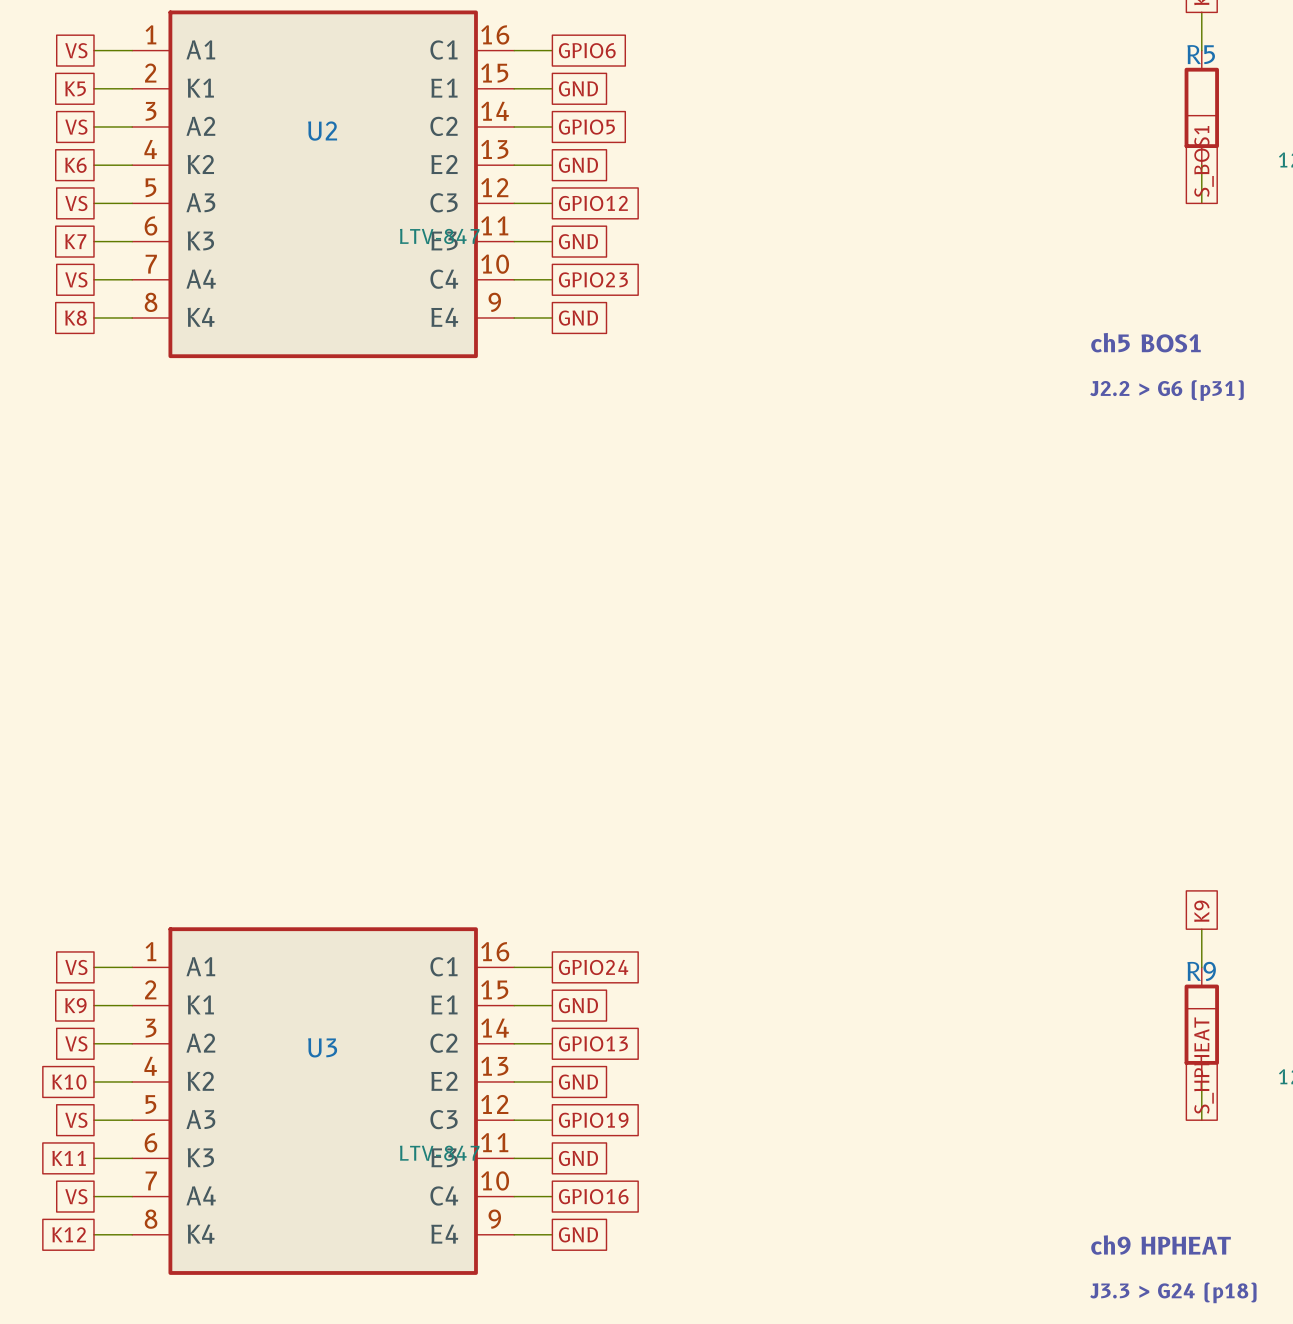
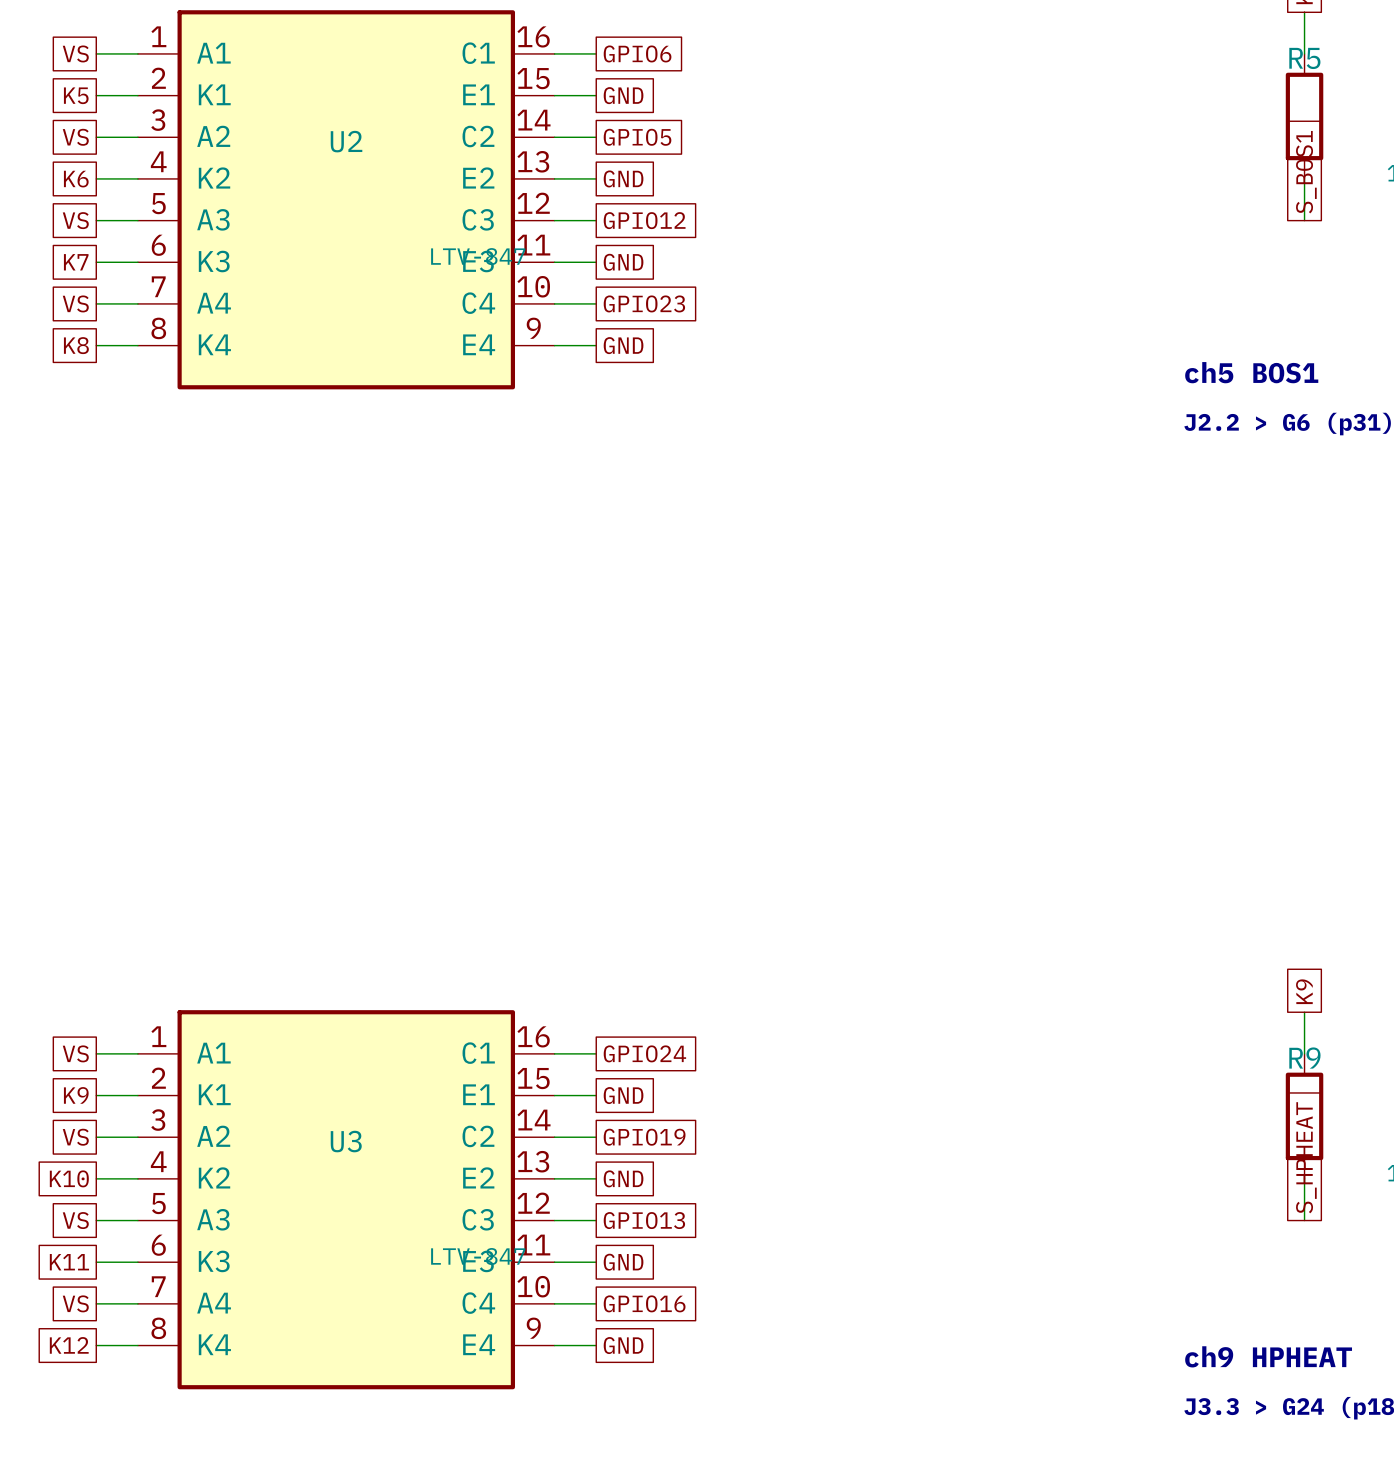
global label: GPIO13 (593, 1043) -> GPIO19 (644, 1137)
global label: GPIO19 (593, 1120) -> GPIO13 (644, 1220)

